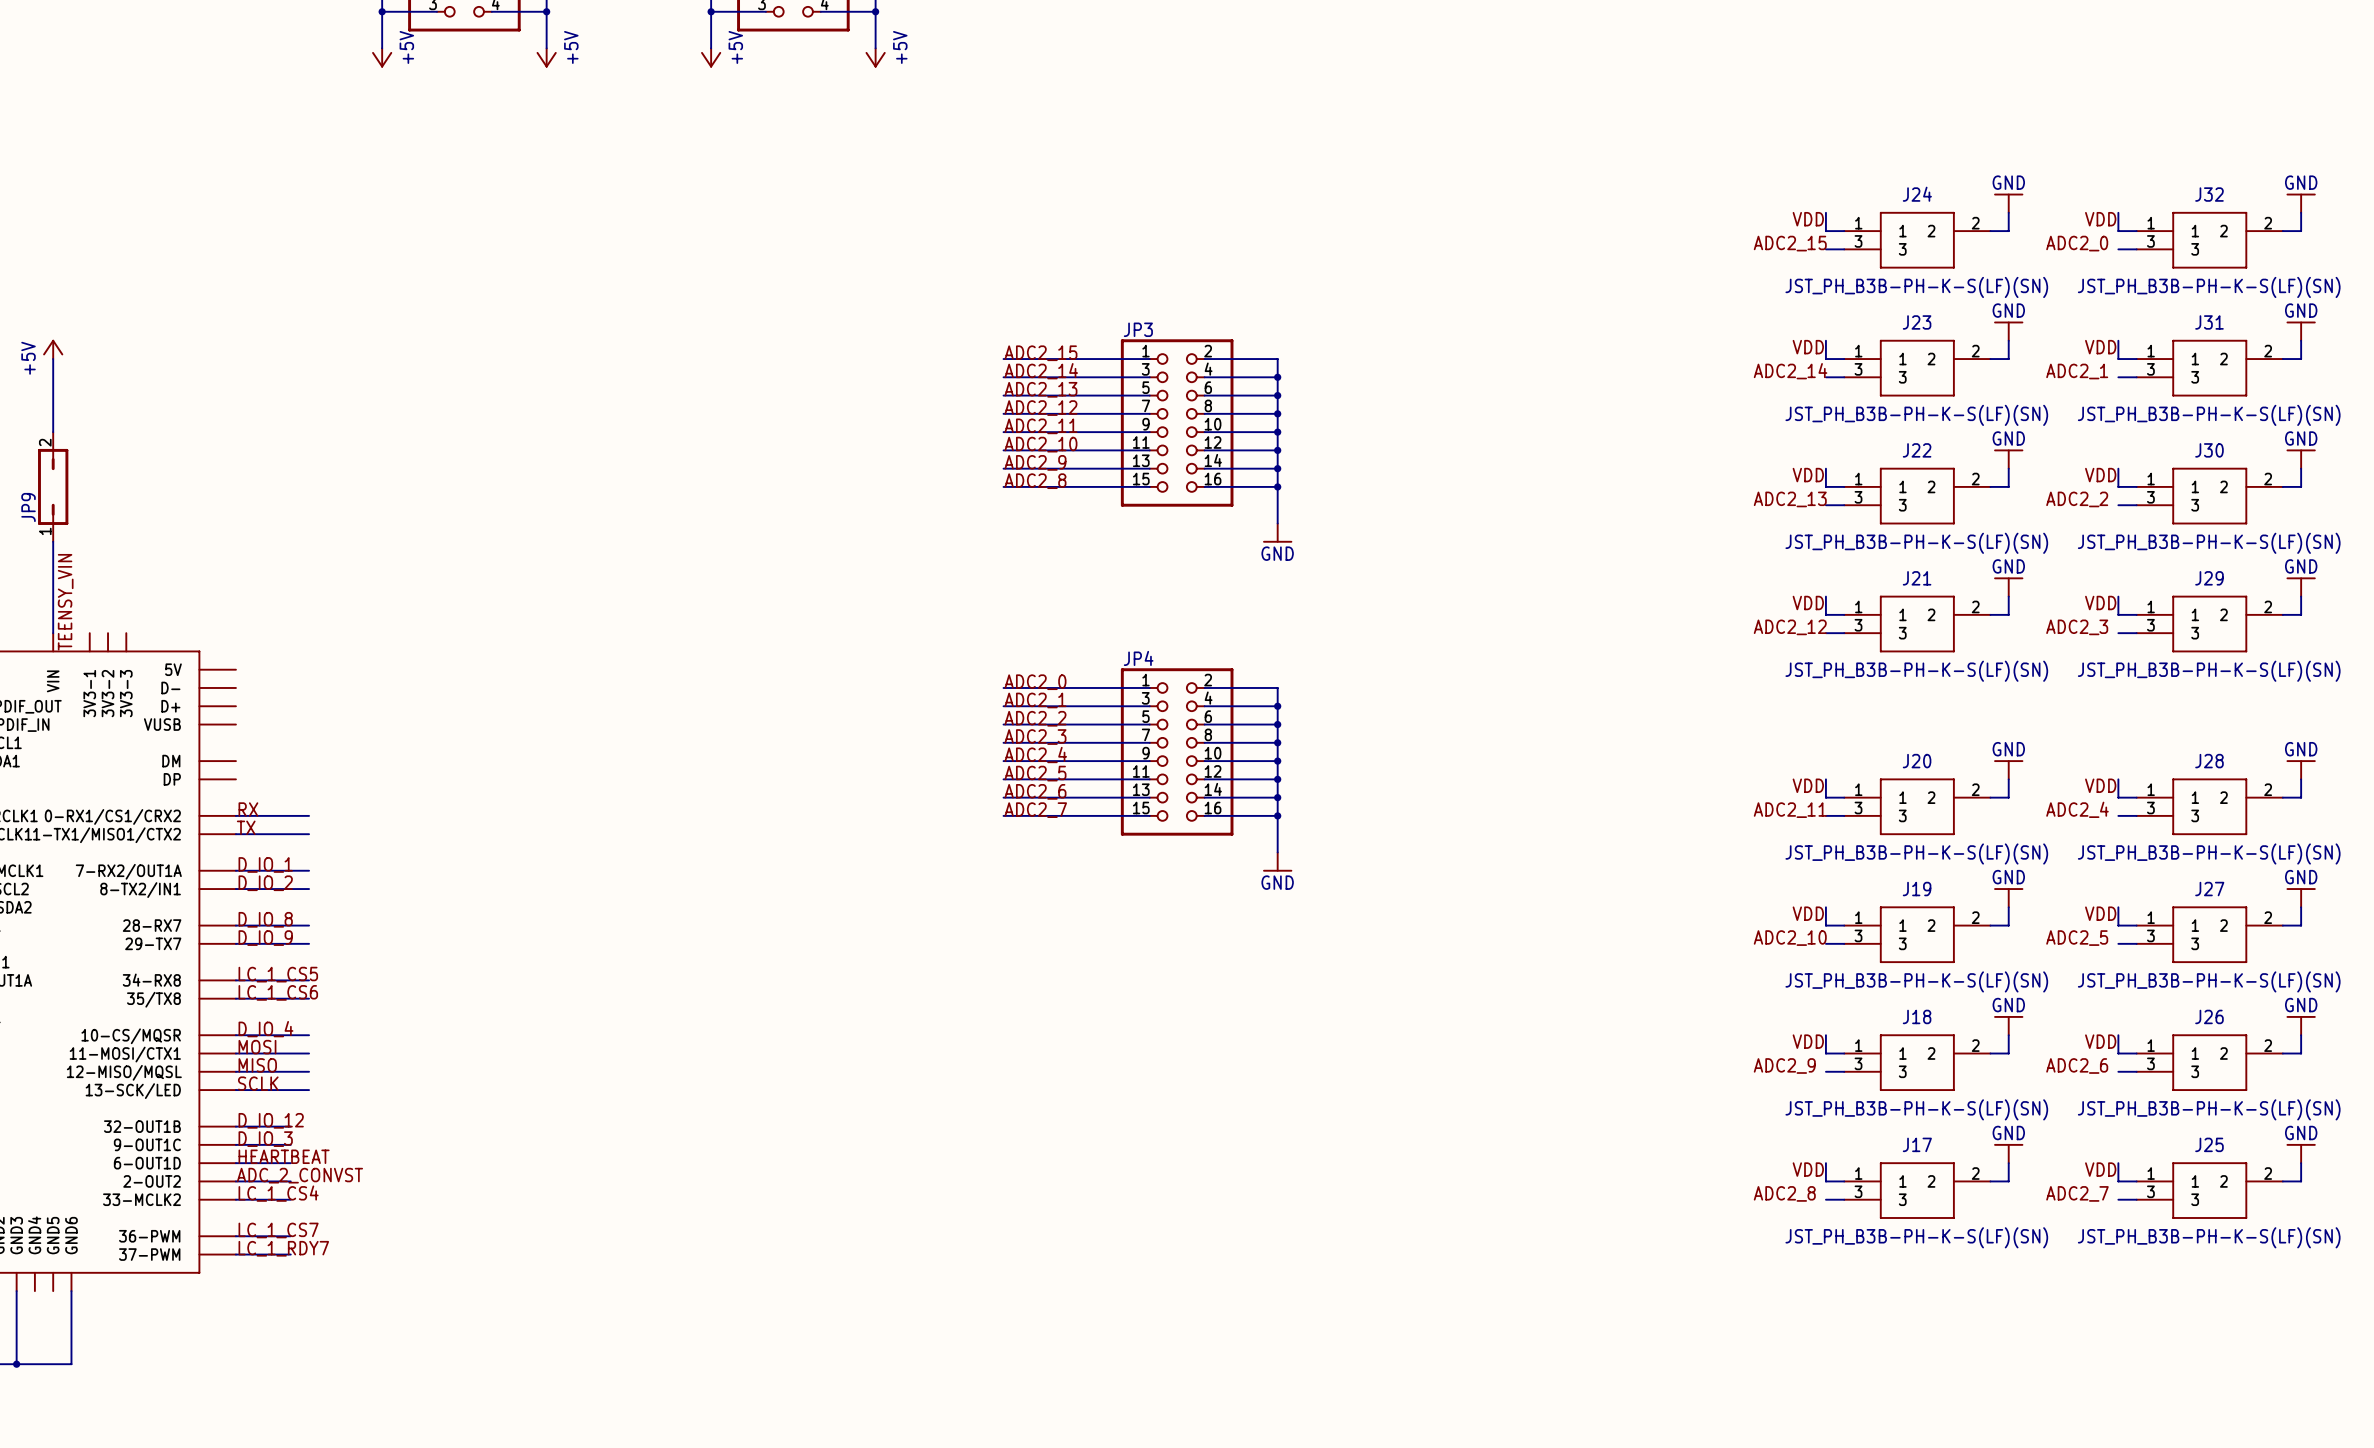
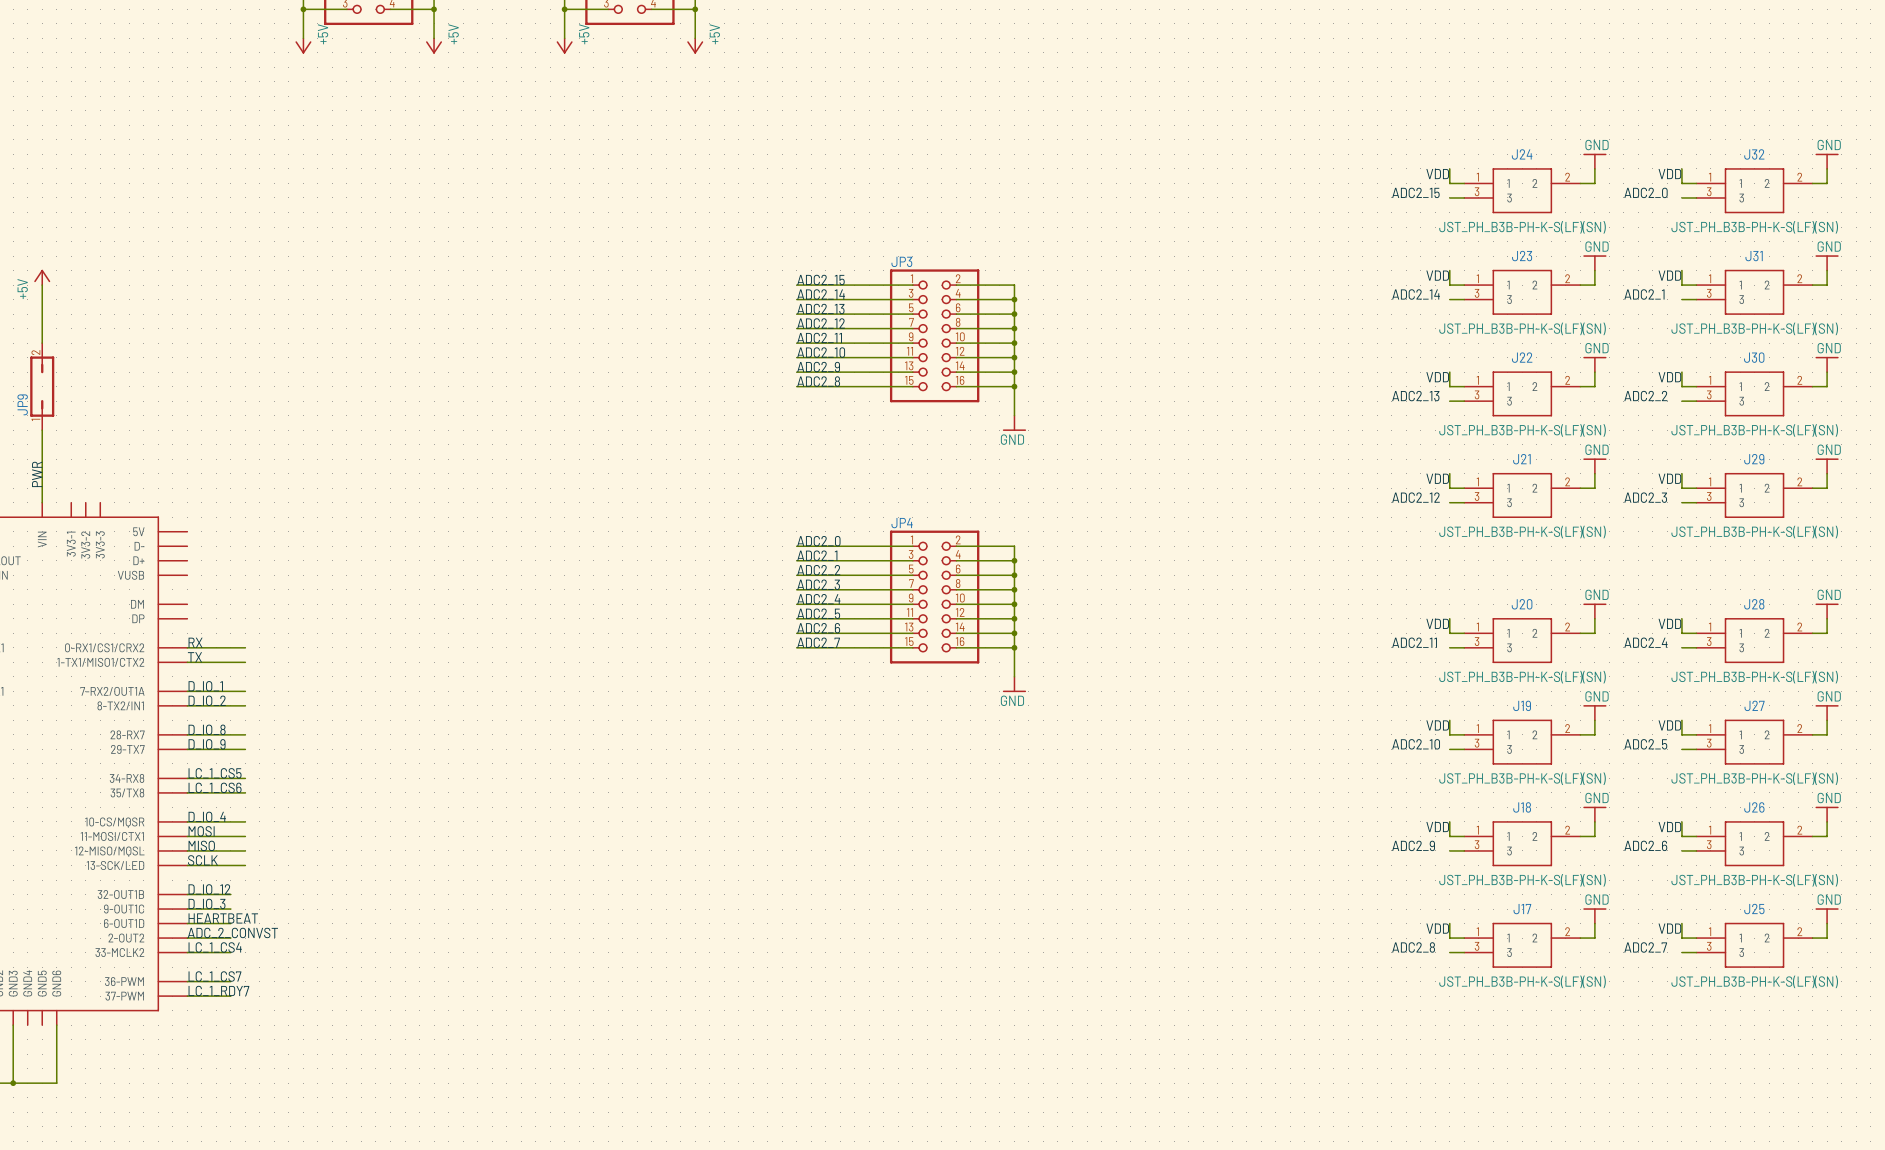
label: none -> PWR (37, 474)
label: TEENSY_VIN (65, 602) -> none

